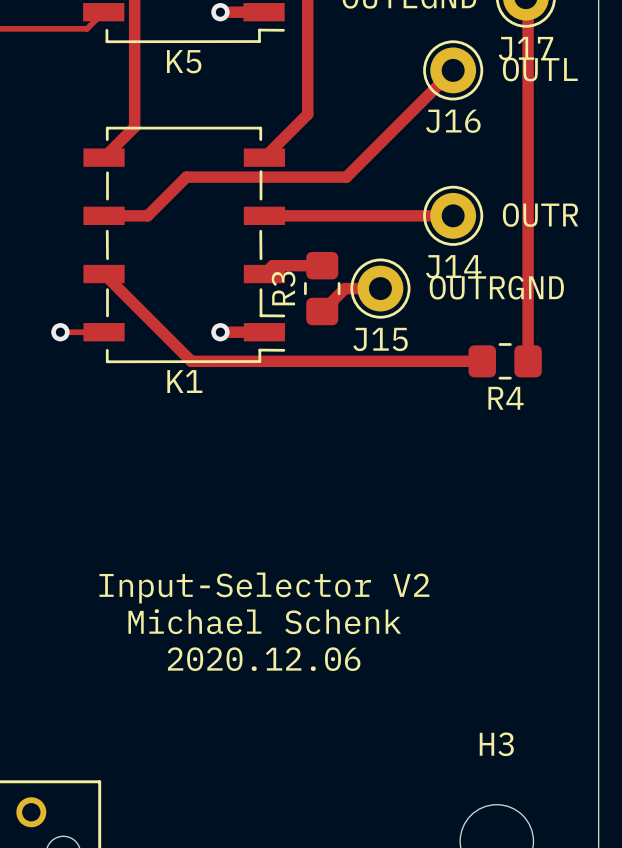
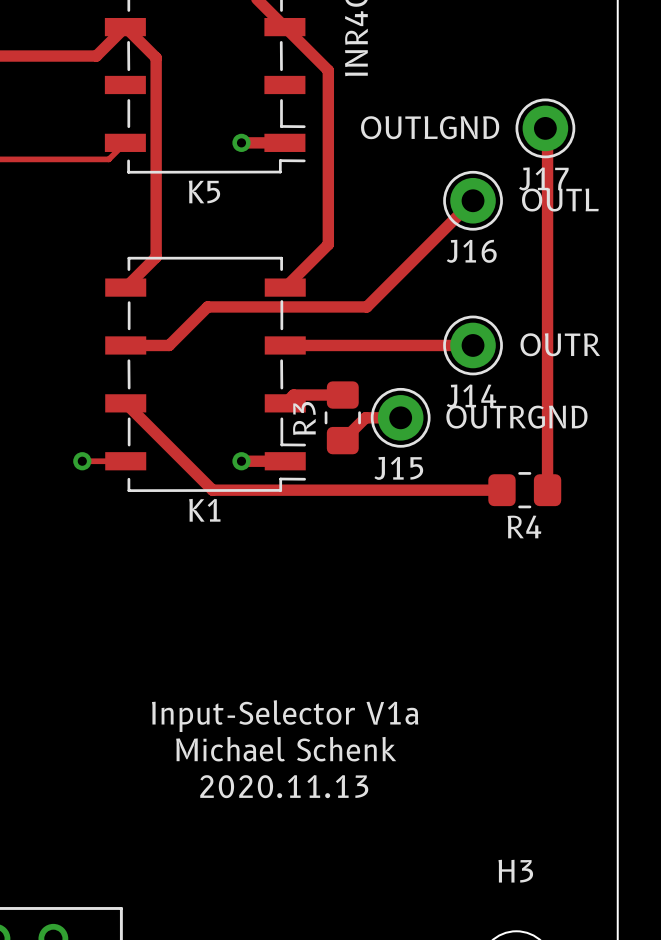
text: Input-Selector V2 (264, 588) -> Input-Selector V1a (285, 716)
text: 2020.12.06 (264, 659) -> 2020.11.13 (284, 786)

